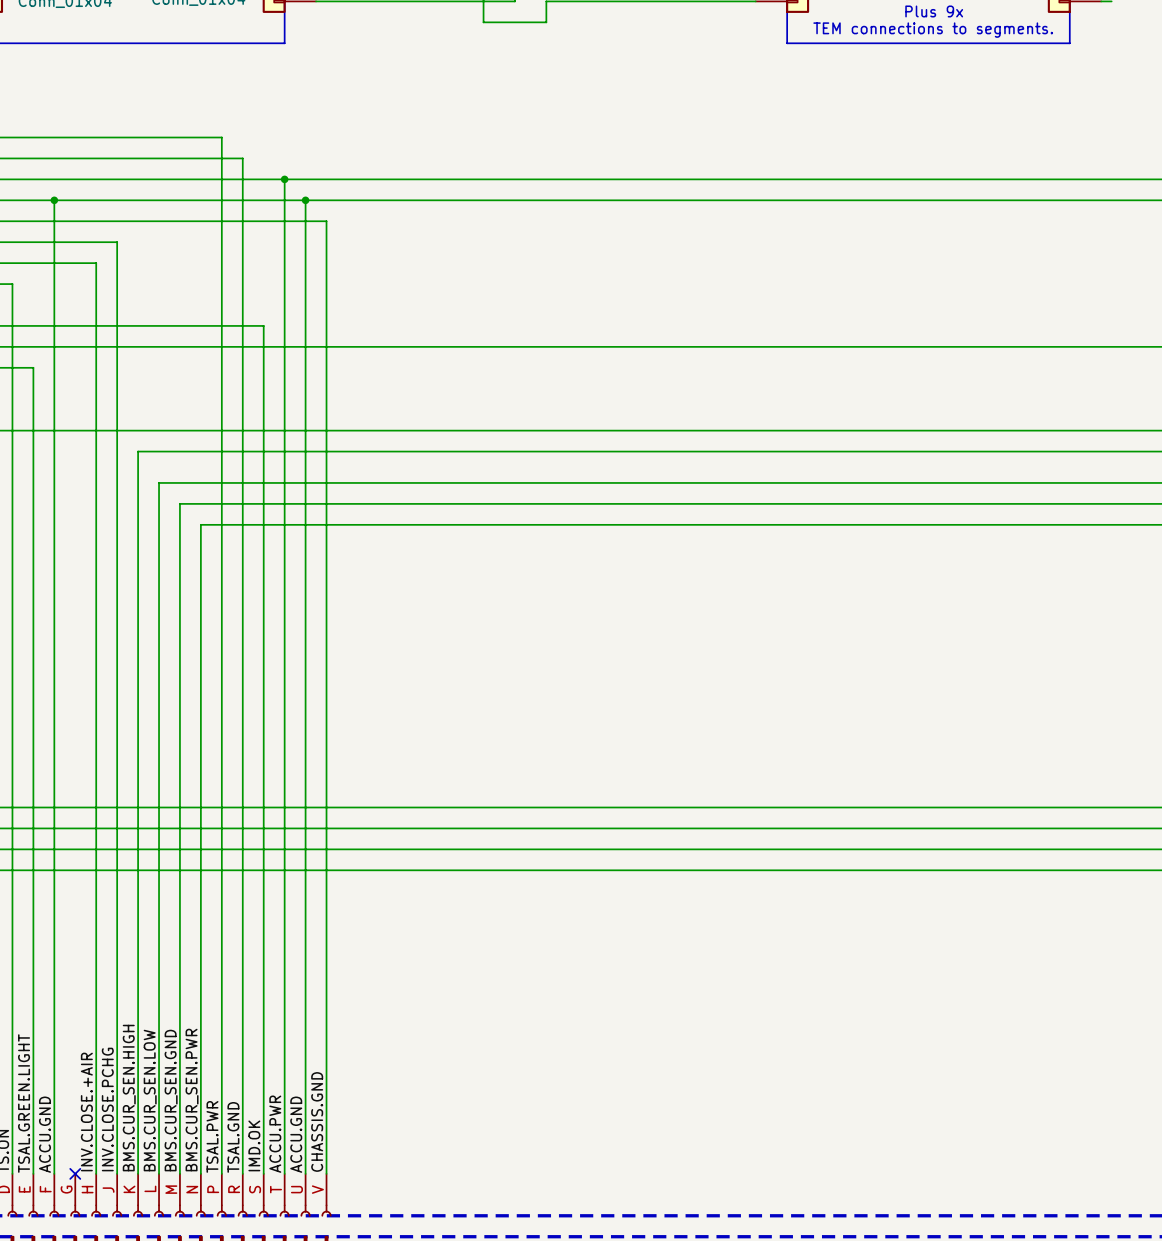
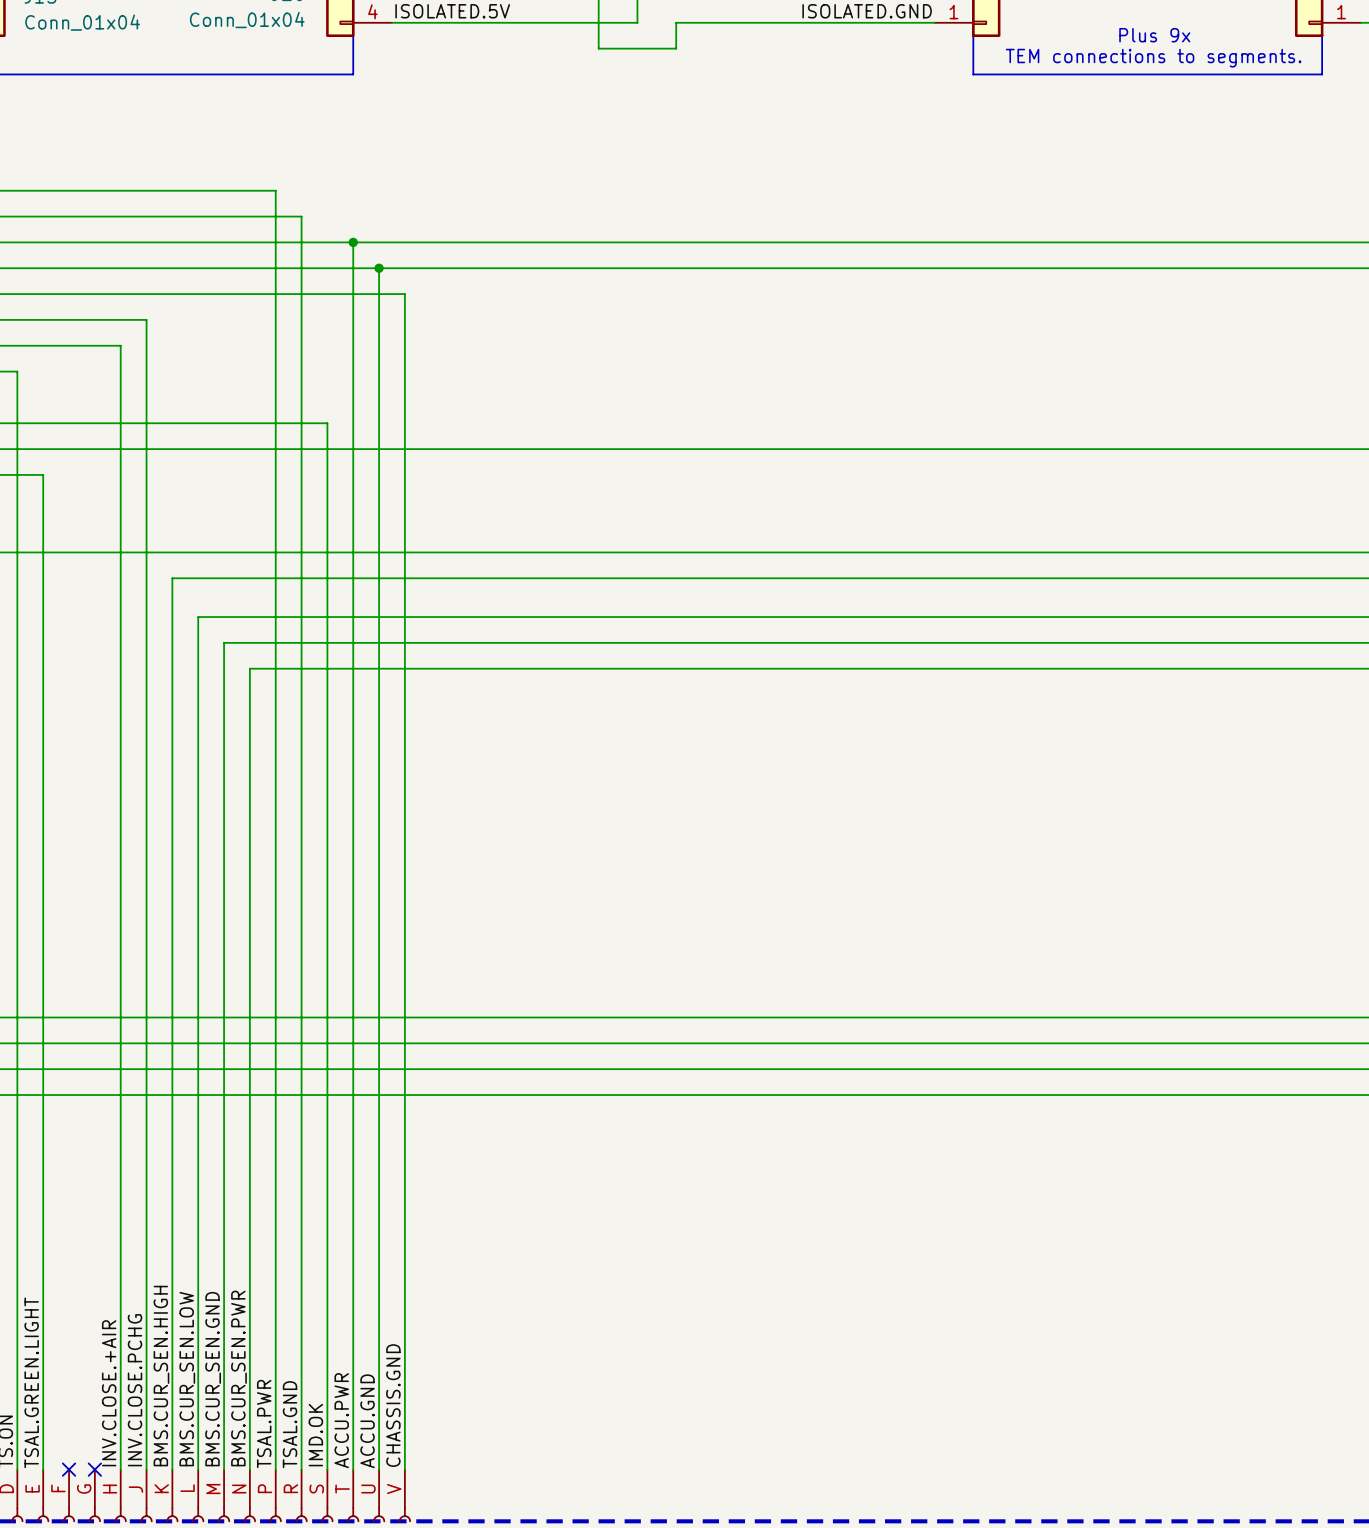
wire: (54, 200) (54, 1173) -> none
junction: (54, 200) -> none
label: ACCU.GND (44, 1134) -> none
no-connect mark: none -> (69, 1469)

